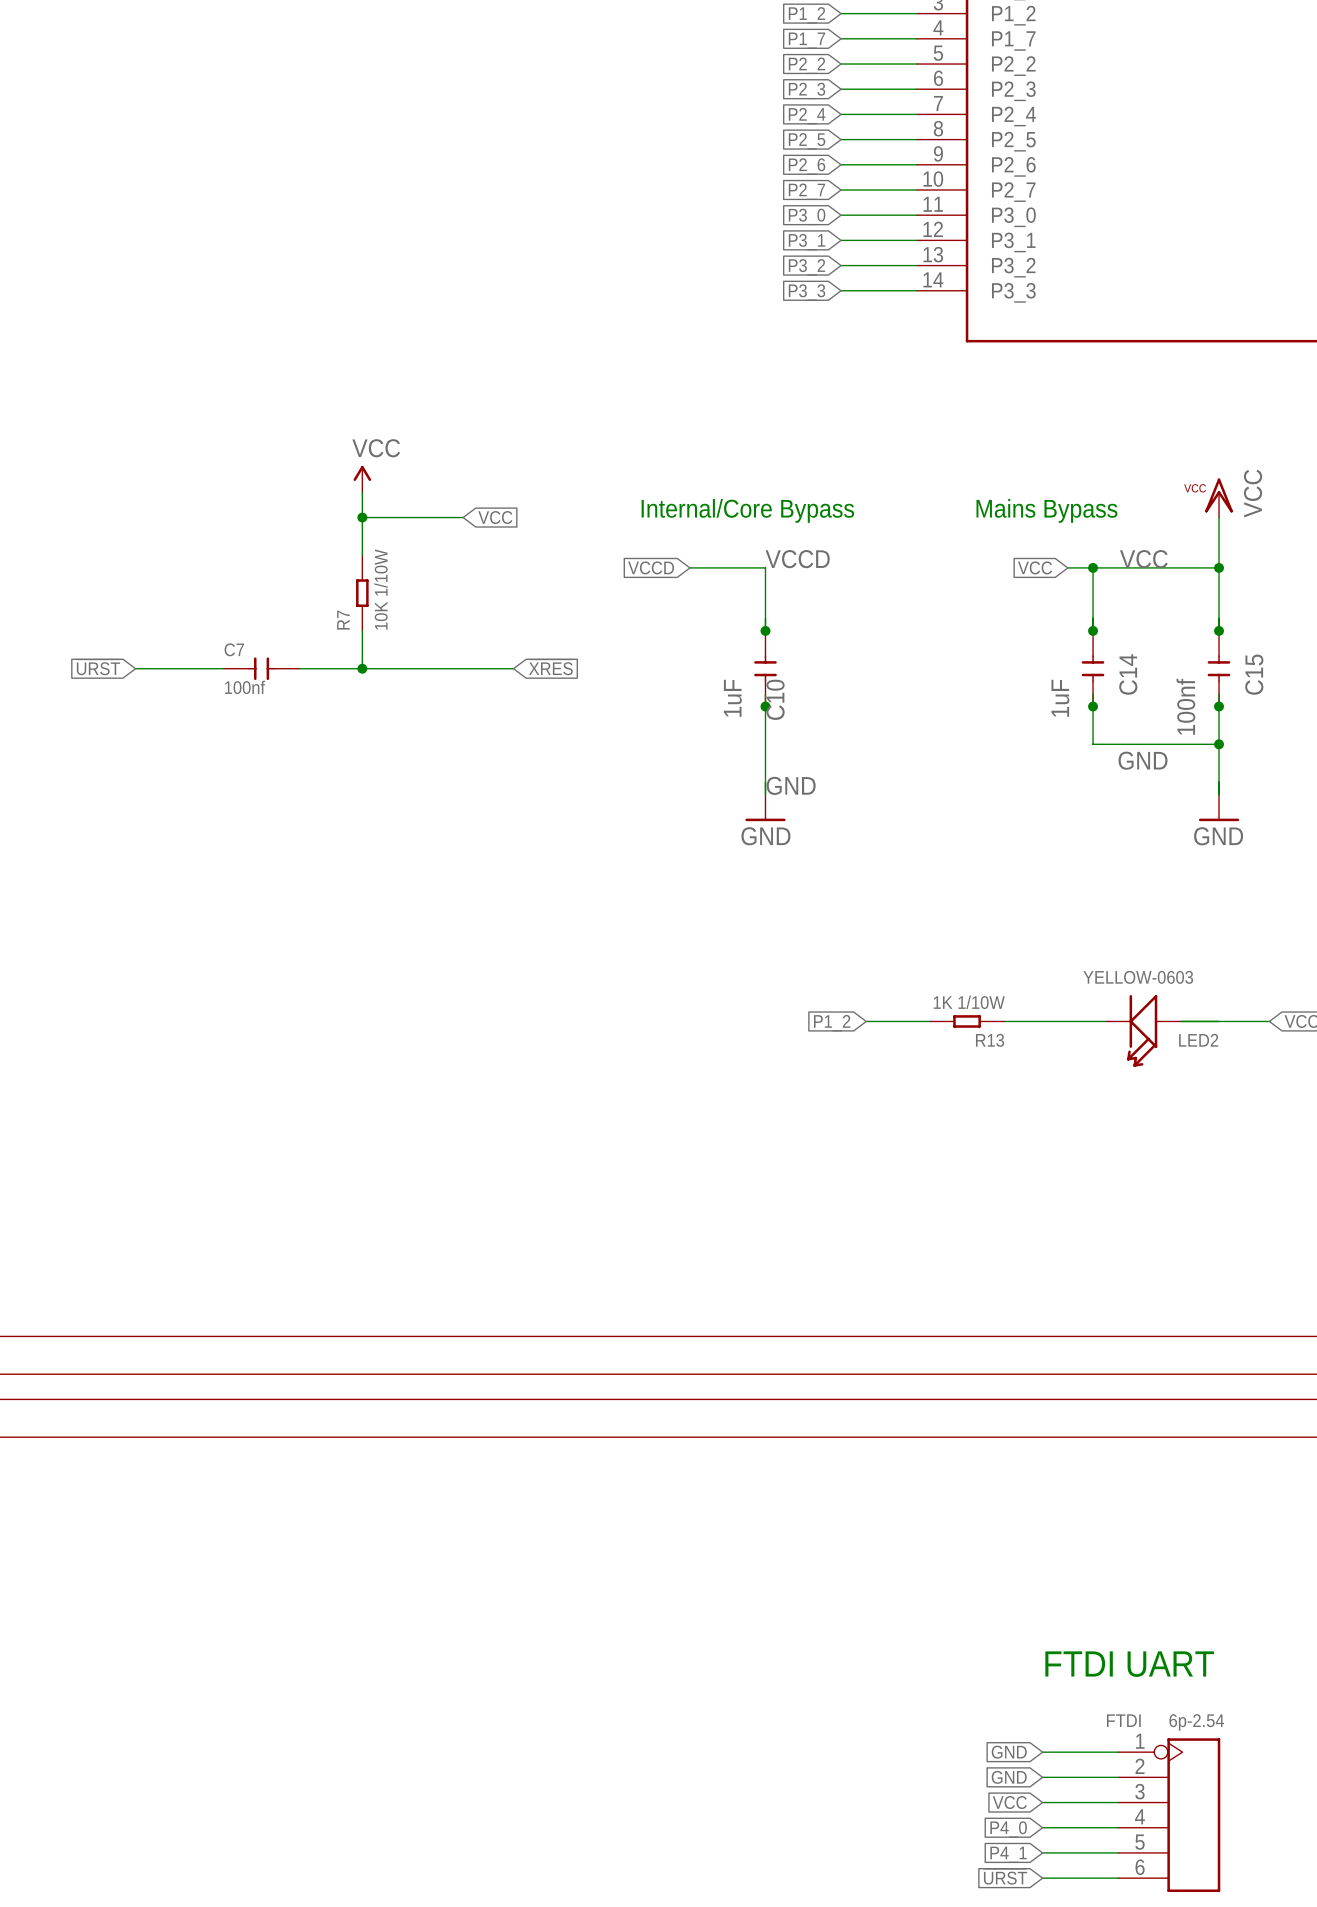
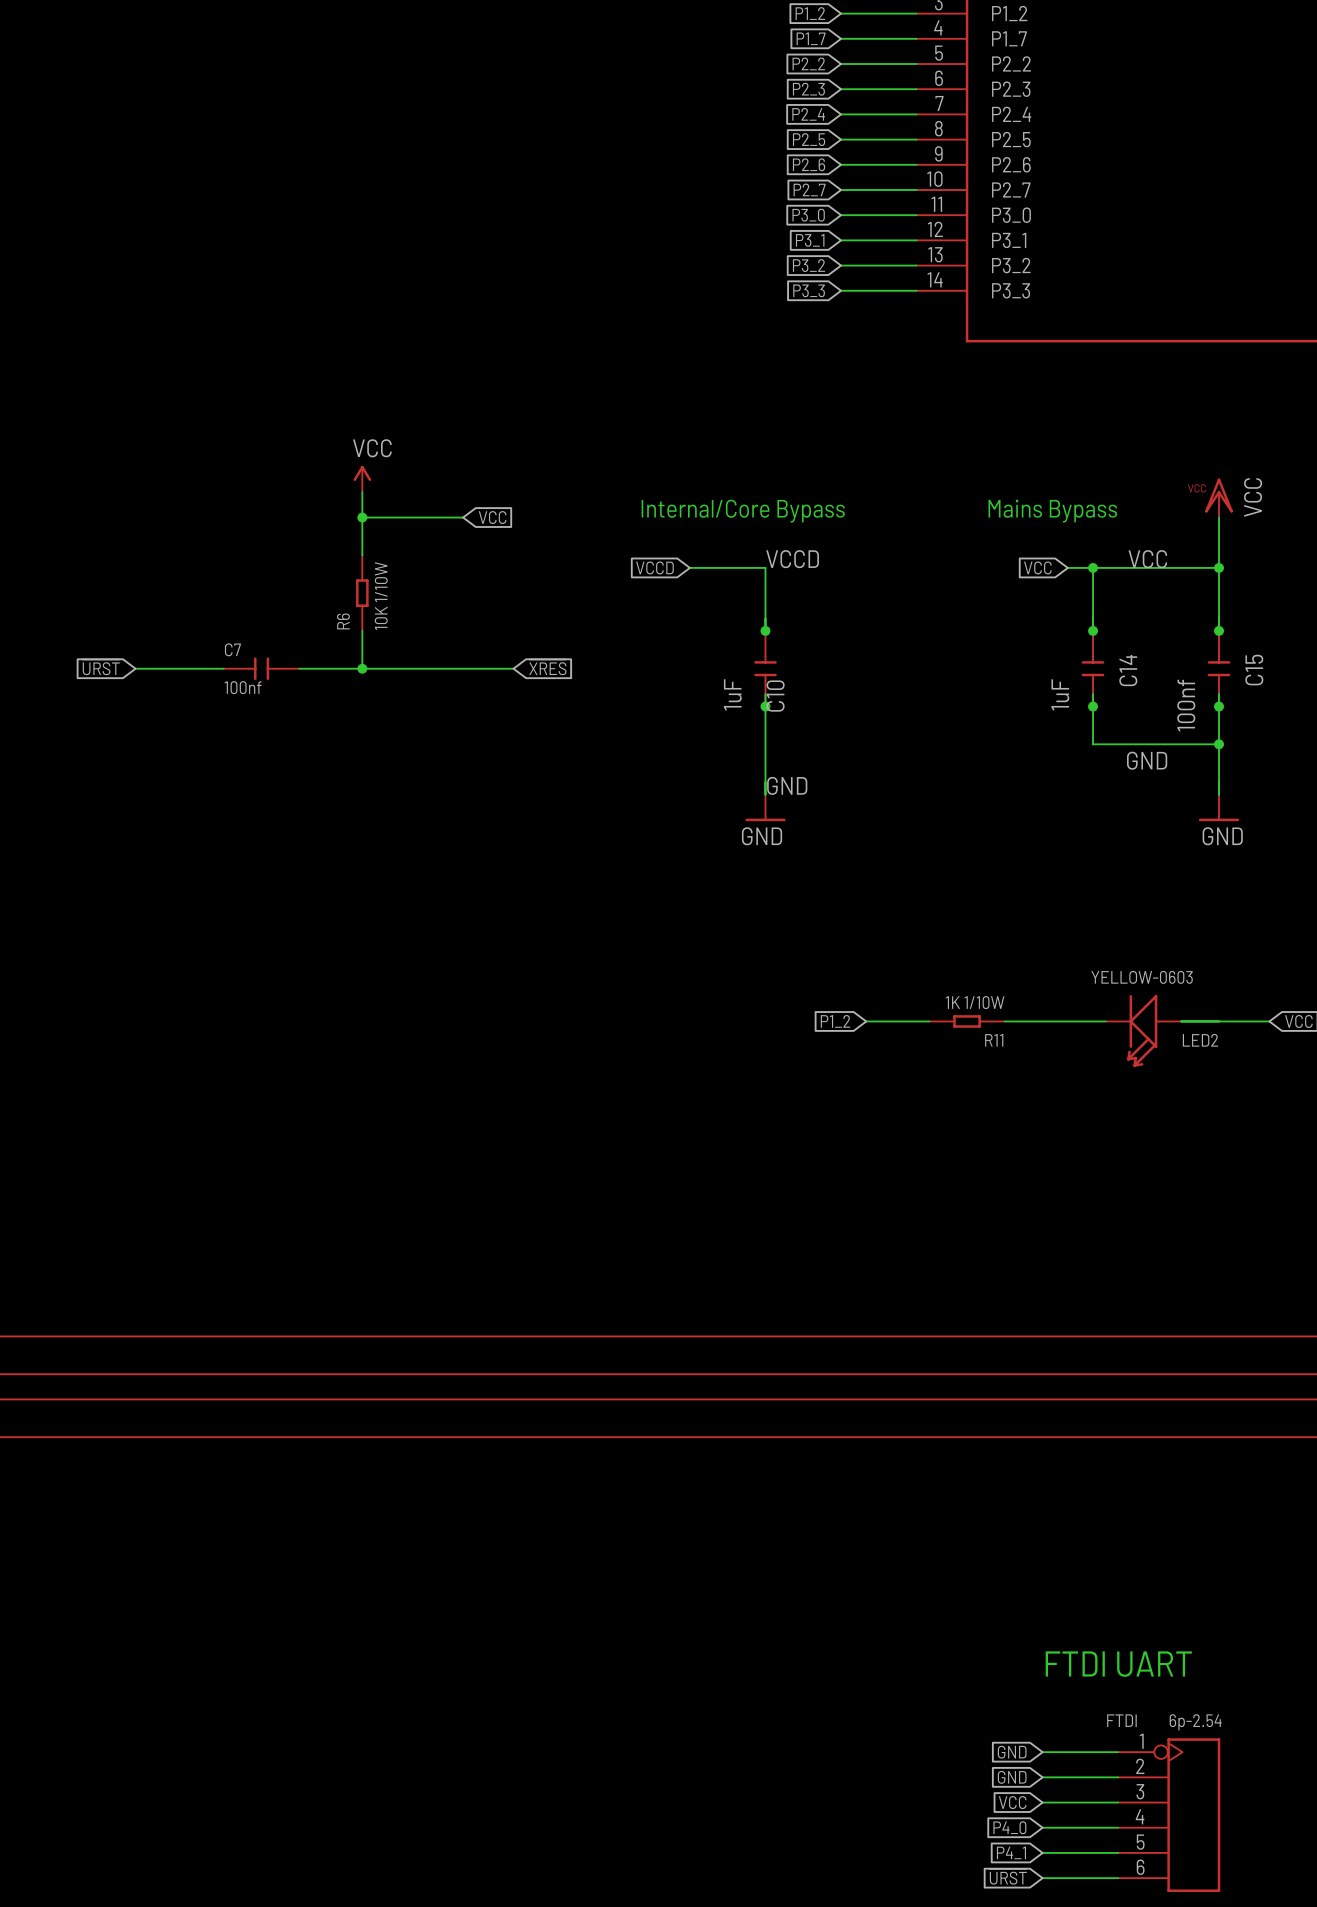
R7 name: R7 (343, 620) -> R6 (343, 621)
R13 name: R13 (990, 1040) -> R11 (994, 1040)

